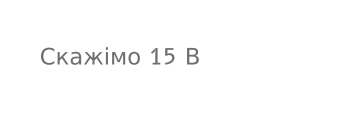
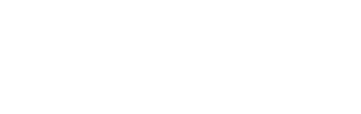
label: Скажімо 15 В (119, 56) -> none

